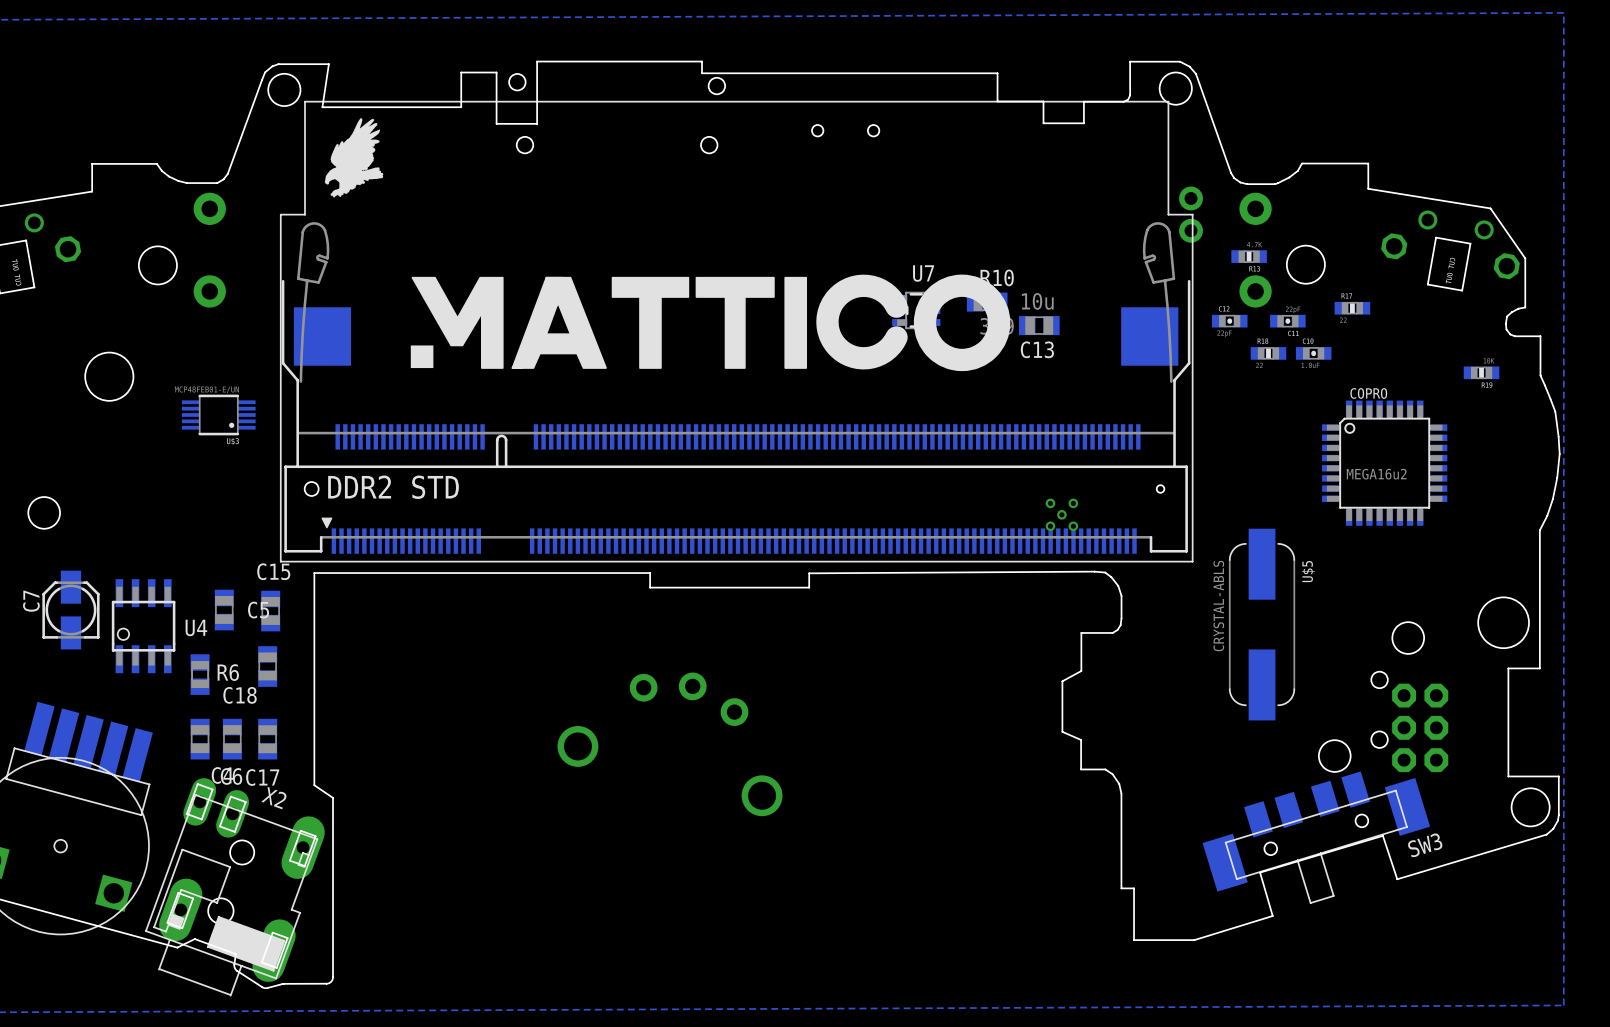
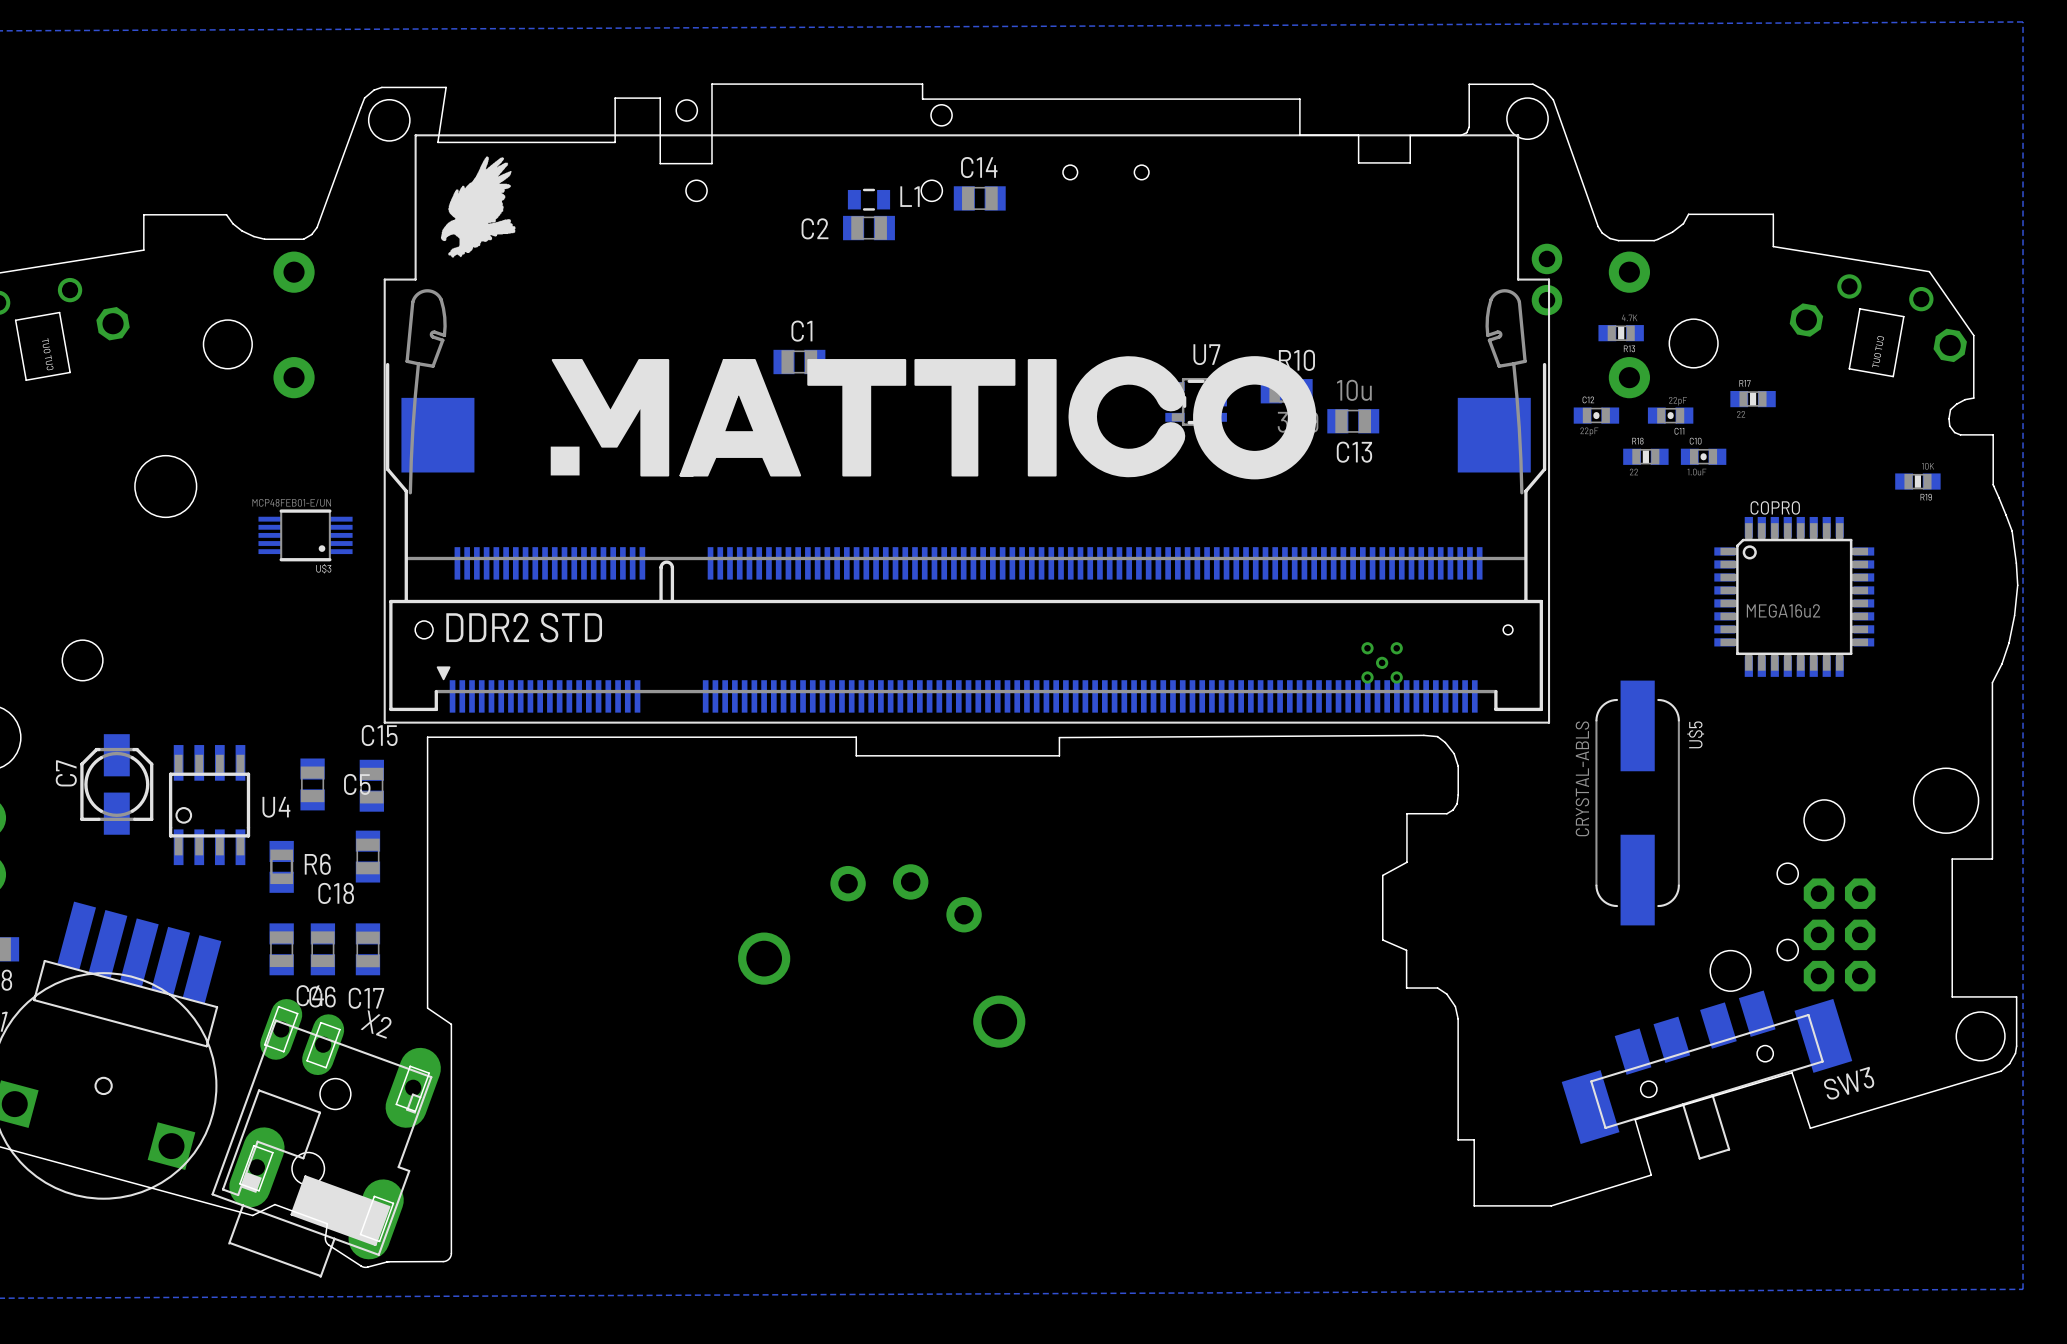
C14: none -> (979, 198)
L1: none -> (868, 199)
C2: none -> (868, 228)
C1: none -> (799, 362)

